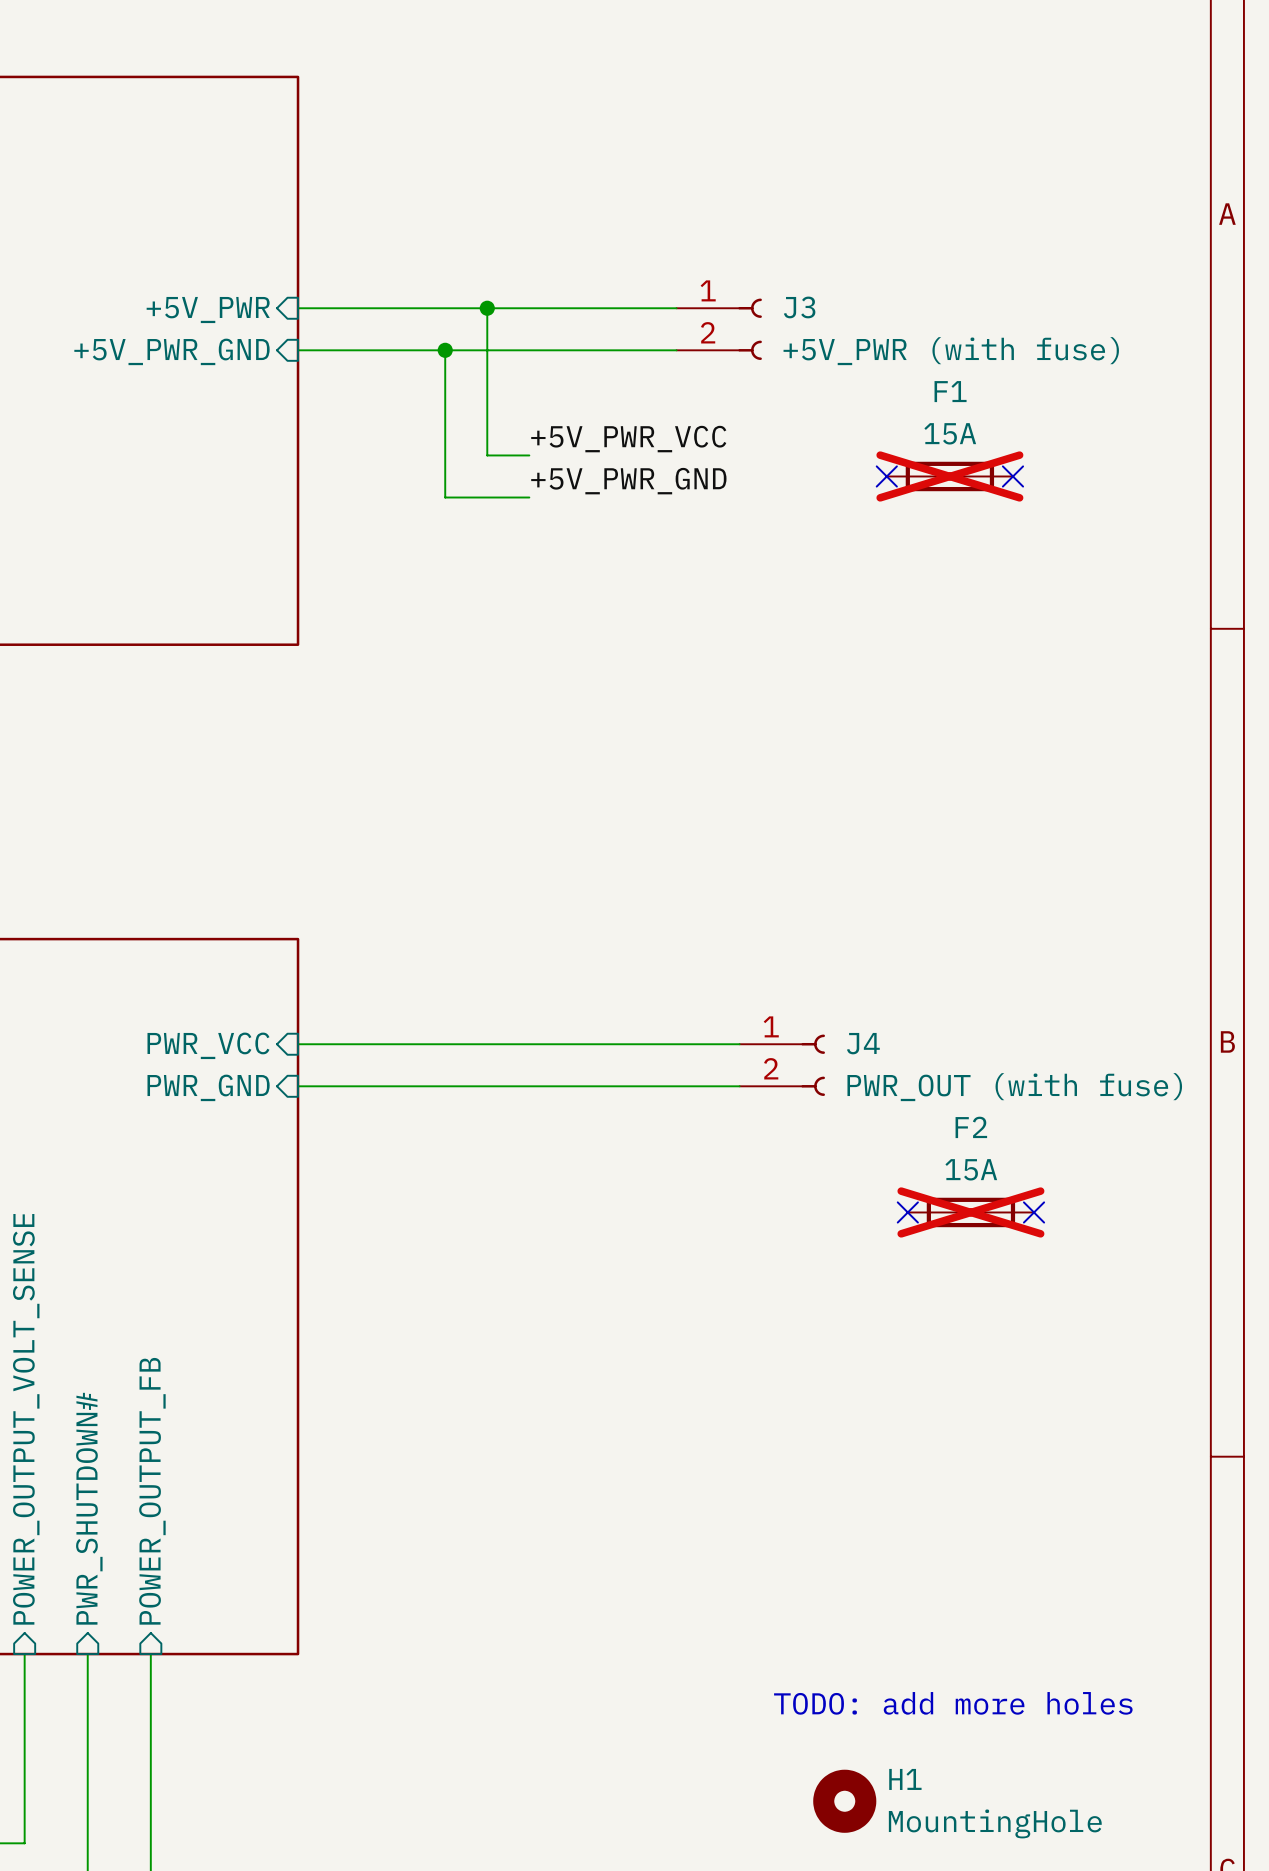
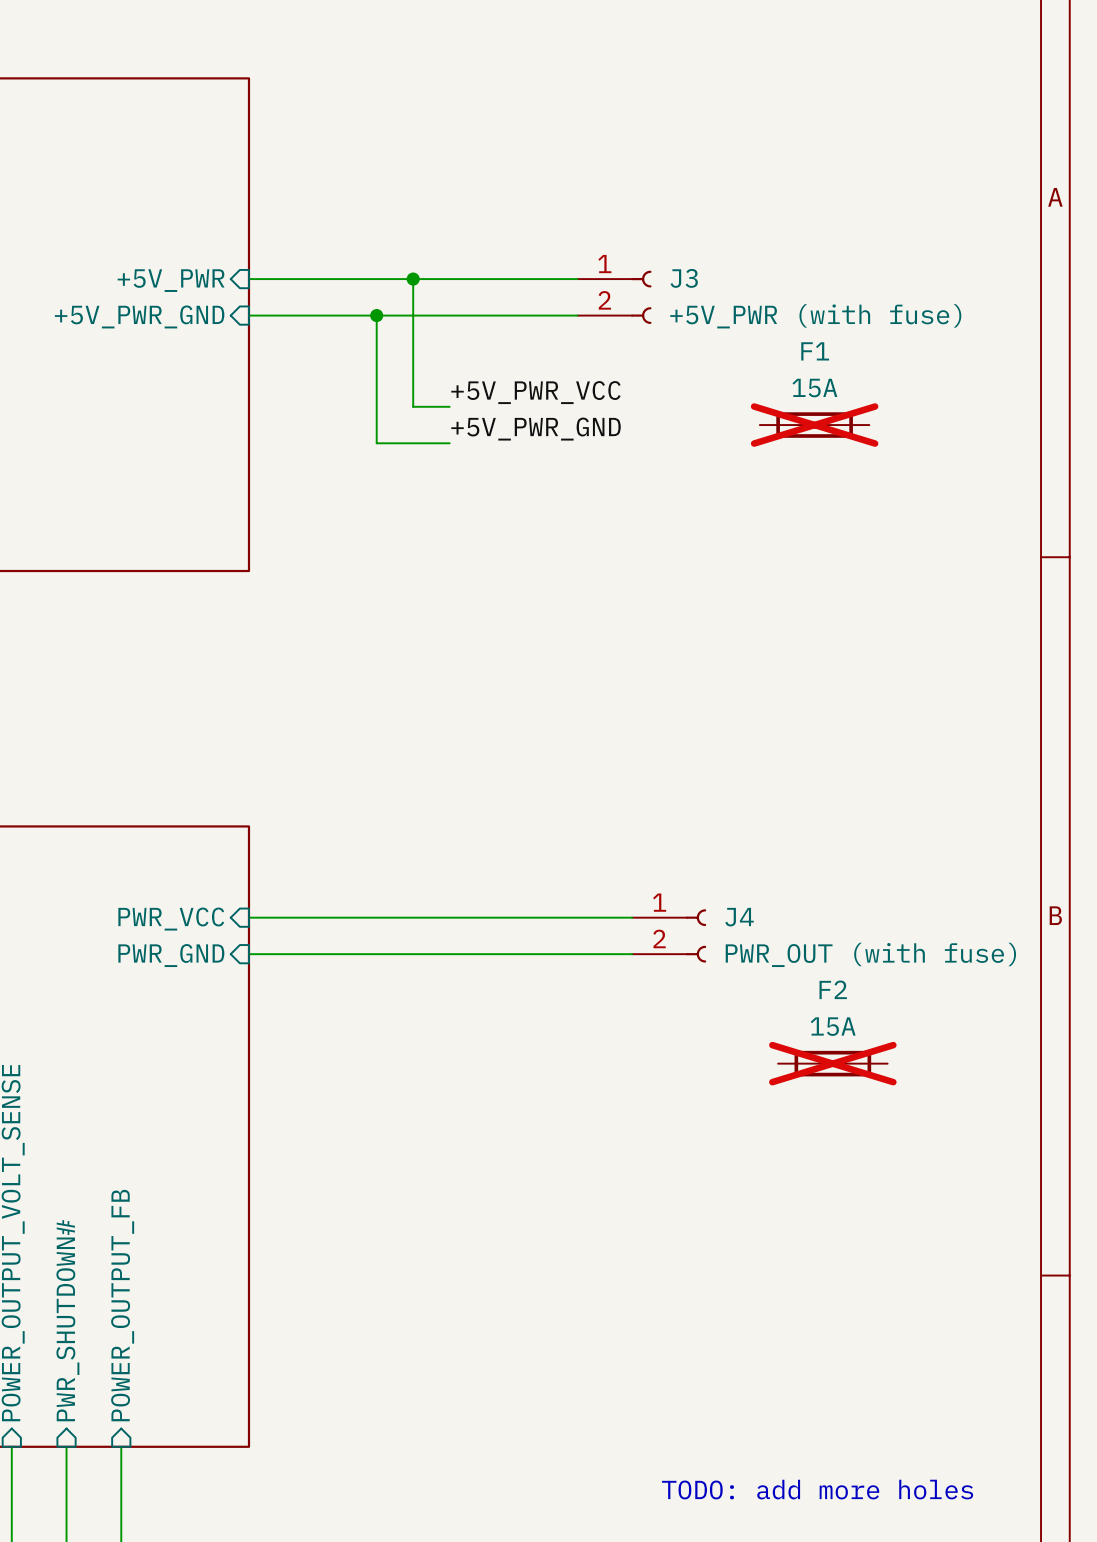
no-connect mark: (886, 476) -> none
no-connect mark: (1012, 476) -> none
no-connect mark: (907, 1212) -> none
no-connect mark: (1034, 1212) -> none

